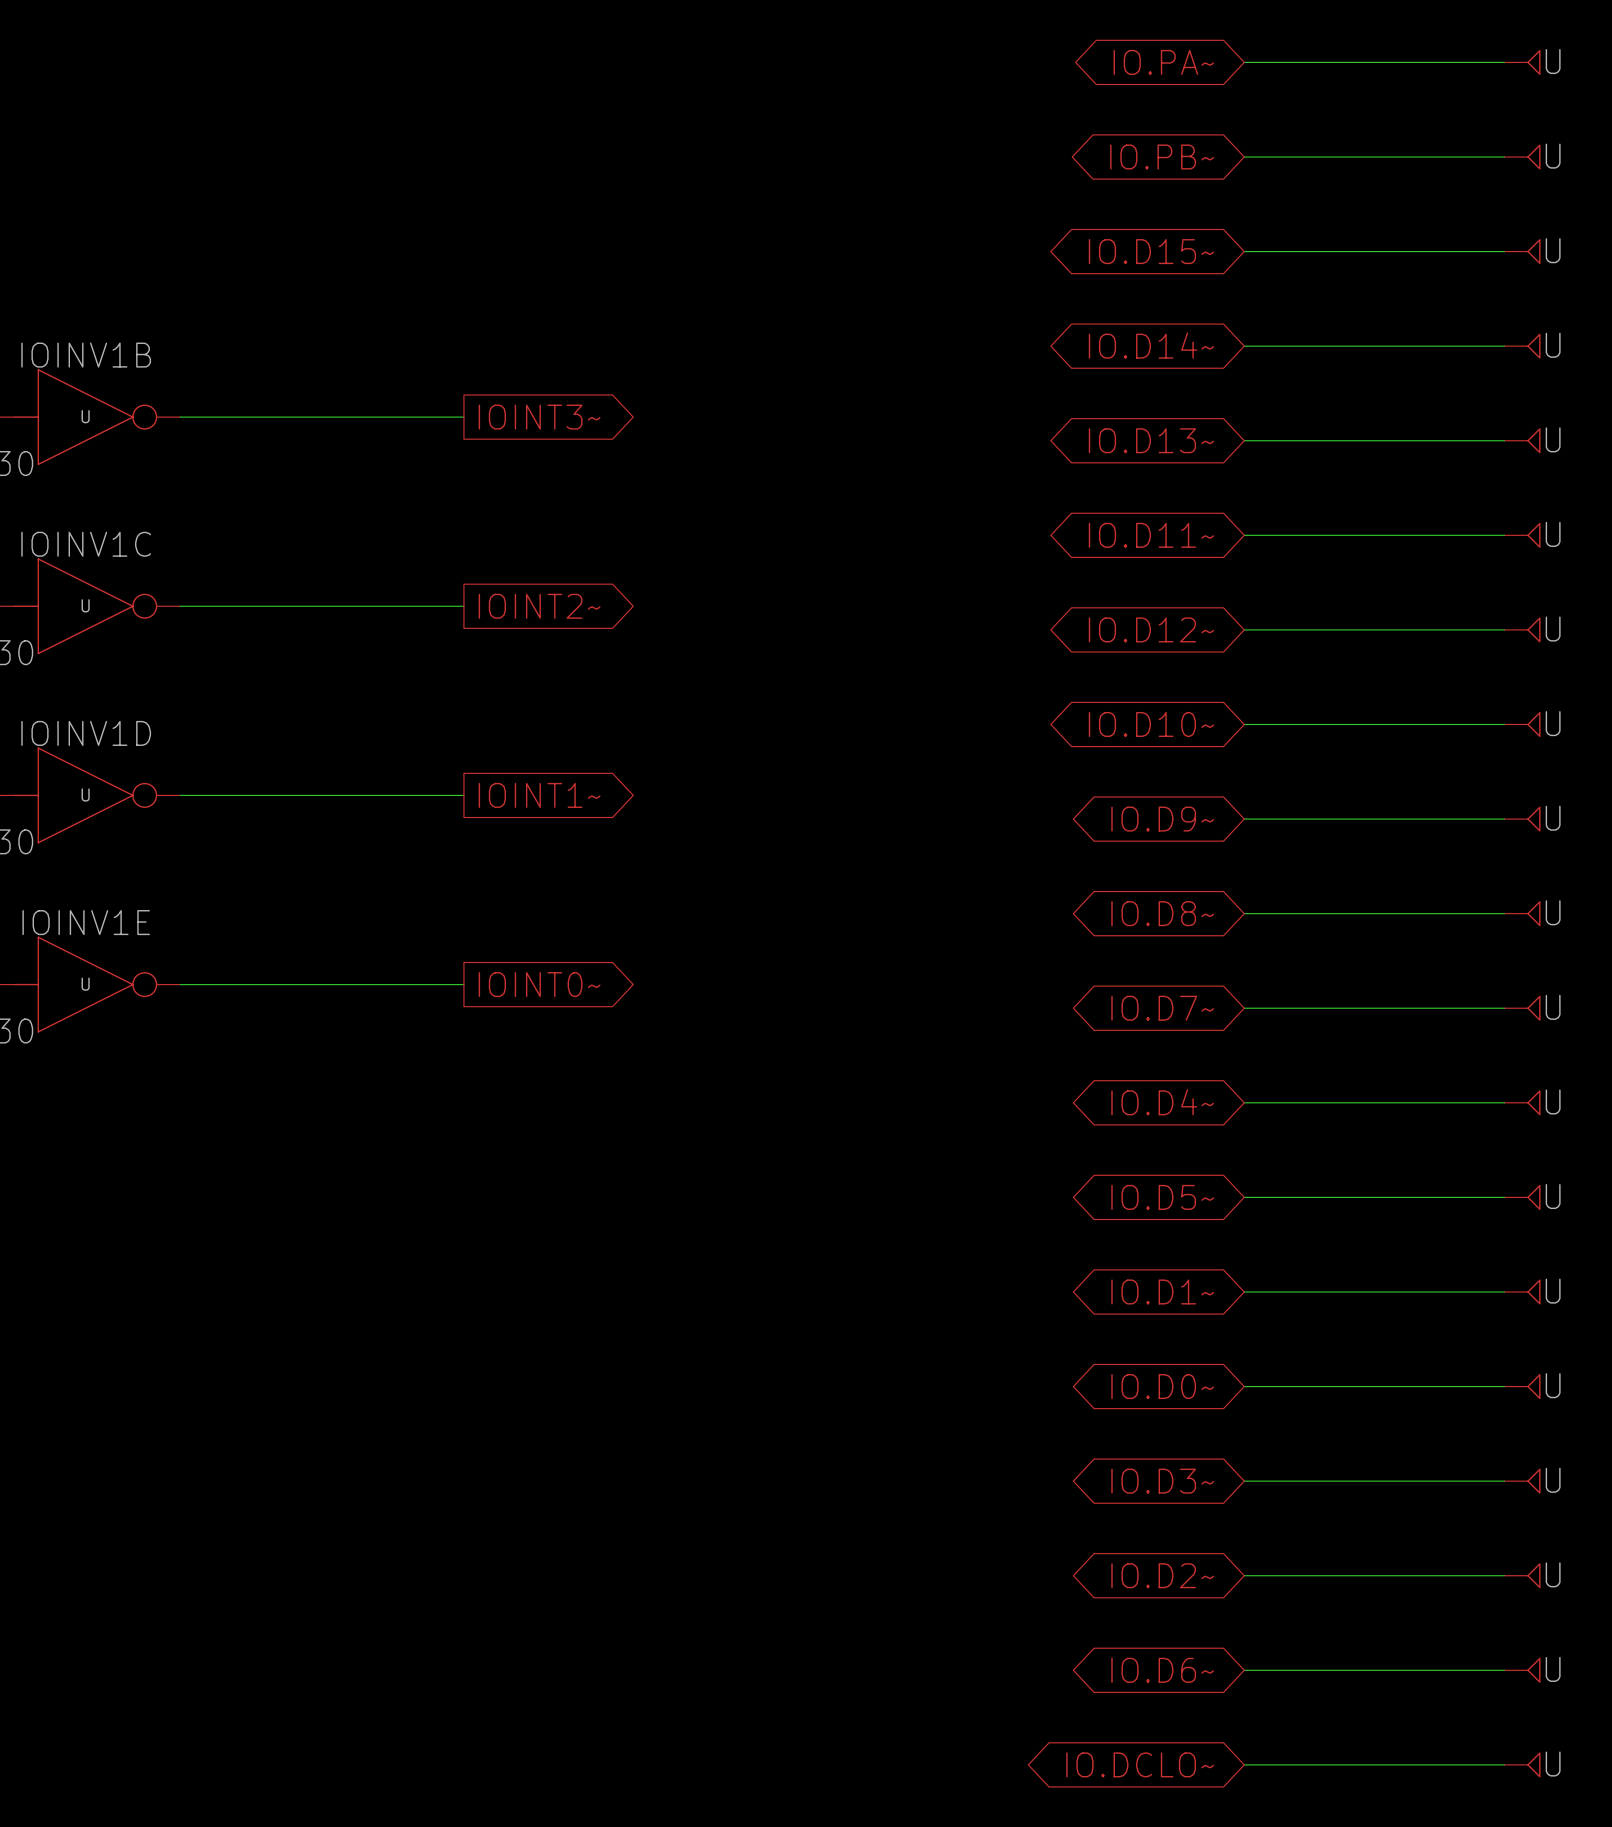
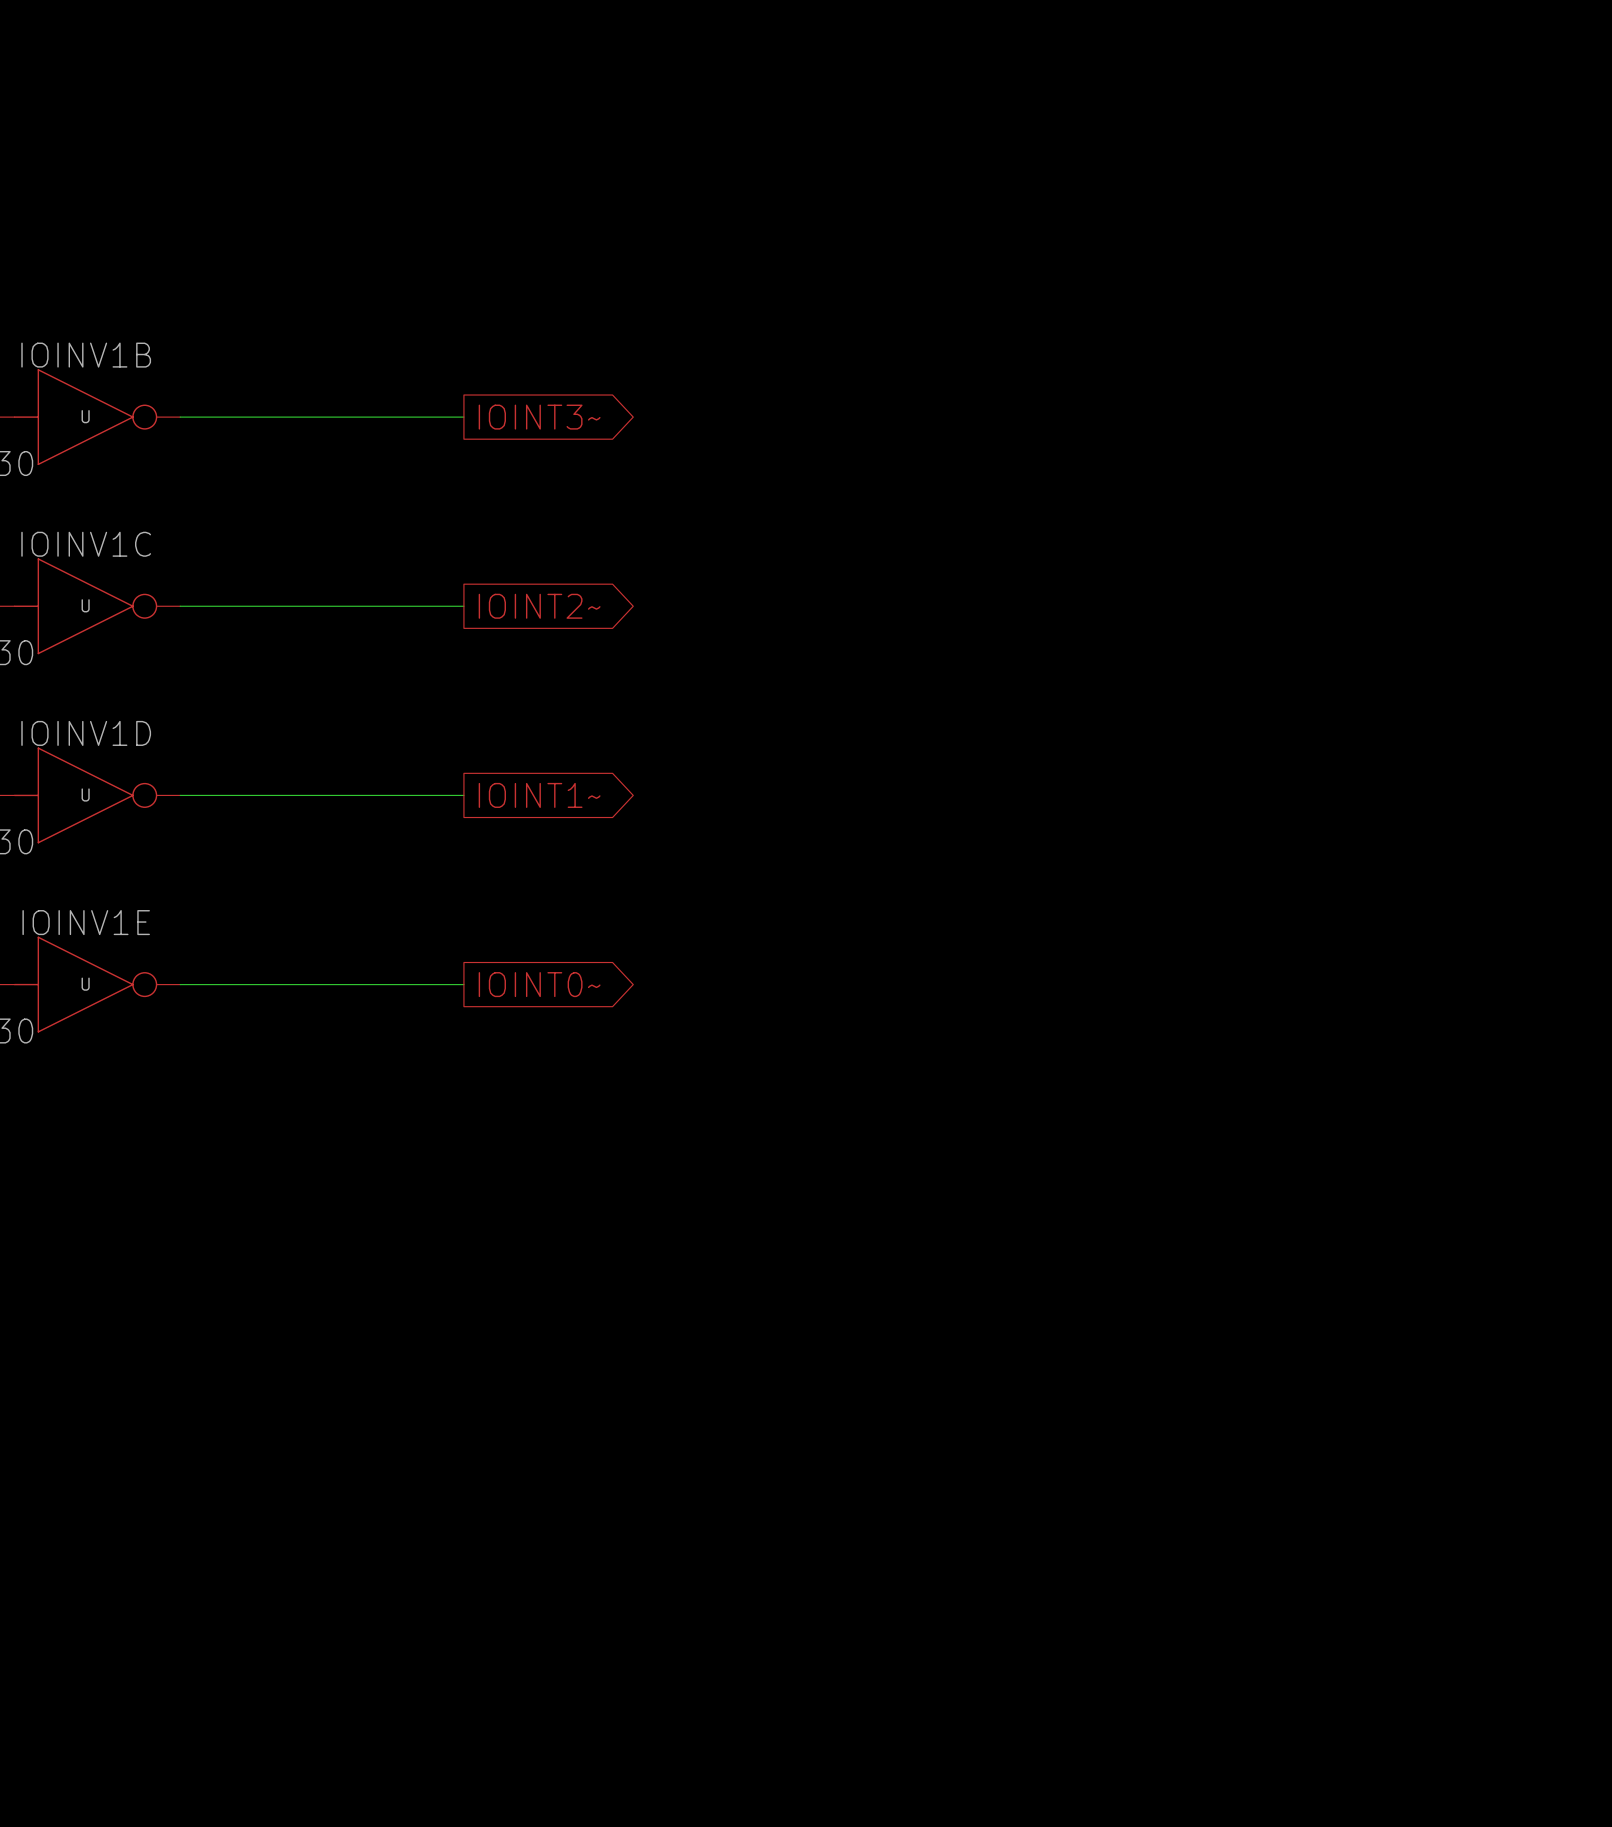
global label: IO.PA~ (1163, 62) -> none
wire: (1244, 62) (1504, 62) -> none
U: (1522, 62) -> none
global label: IO.PB~ (1162, 157) -> none
wire: (1244, 157) (1504, 157) -> none
U: (1522, 157) -> none
global label: IO.D15~ (1151, 251) -> none
wire: (1244, 251) (1504, 251) -> none
U: (1522, 251) -> none
global label: IO.D14~ (1151, 345) -> none
wire: (1244, 346) (1504, 346) -> none
U: (1522, 346) -> none
global label: IO.D13~ (1151, 440) -> none
wire: (1244, 440) (1504, 440) -> none
U: (1522, 440) -> none
global label: IO.D11~ (1151, 535) -> none
wire: (1244, 535) (1504, 535) -> none
U: (1522, 535) -> none
global label: IO.D12~ (1151, 629) -> none
wire: (1244, 629) (1504, 629) -> none
U: (1522, 629) -> none
global label: IO.D10~ (1151, 724) -> none
wire: (1244, 724) (1504, 724) -> none
U: (1522, 724) -> none
global label: IO.D9~ (1162, 819) -> none
wire: (1244, 819) (1504, 819) -> none
U: (1522, 819) -> none
global label: IO.D8~ (1162, 913) -> none
wire: (1244, 913) (1504, 913) -> none
U: (1522, 913) -> none
global label: IO.D7~ (1162, 1008) -> none
wire: (1244, 1008) (1504, 1008) -> none
U: (1522, 1008) -> none
global label: IO.D4~ (1162, 1102) -> none
wire: (1244, 1102) (1504, 1102) -> none
U: (1522, 1102) -> none
global label: IO.D5~ (1162, 1197) -> none
wire: (1244, 1197) (1504, 1197) -> none
U: (1522, 1197) -> none
global label: IO.D1~ (1162, 1291) -> none
wire: (1244, 1291) (1504, 1291) -> none
U: (1522, 1291) -> none
global label: IO.D0~ (1162, 1386) -> none
wire: (1244, 1386) (1504, 1386) -> none
U: (1522, 1386) -> none
global label: IO.D3~ (1162, 1481) -> none
wire: (1244, 1481) (1504, 1481) -> none
U: (1522, 1481) -> none
global label: IO.D2~ (1162, 1575) -> none
wire: (1244, 1575) (1504, 1575) -> none
U: (1522, 1575) -> none
global label: IO.D6~ (1162, 1670) -> none
wire: (1244, 1670) (1504, 1670) -> none
U: (1522, 1670) -> none
global label: IO.DCLO~ (1140, 1764) -> none
wire: (1244, 1764) (1504, 1764) -> none
U: (1522, 1764) -> none

